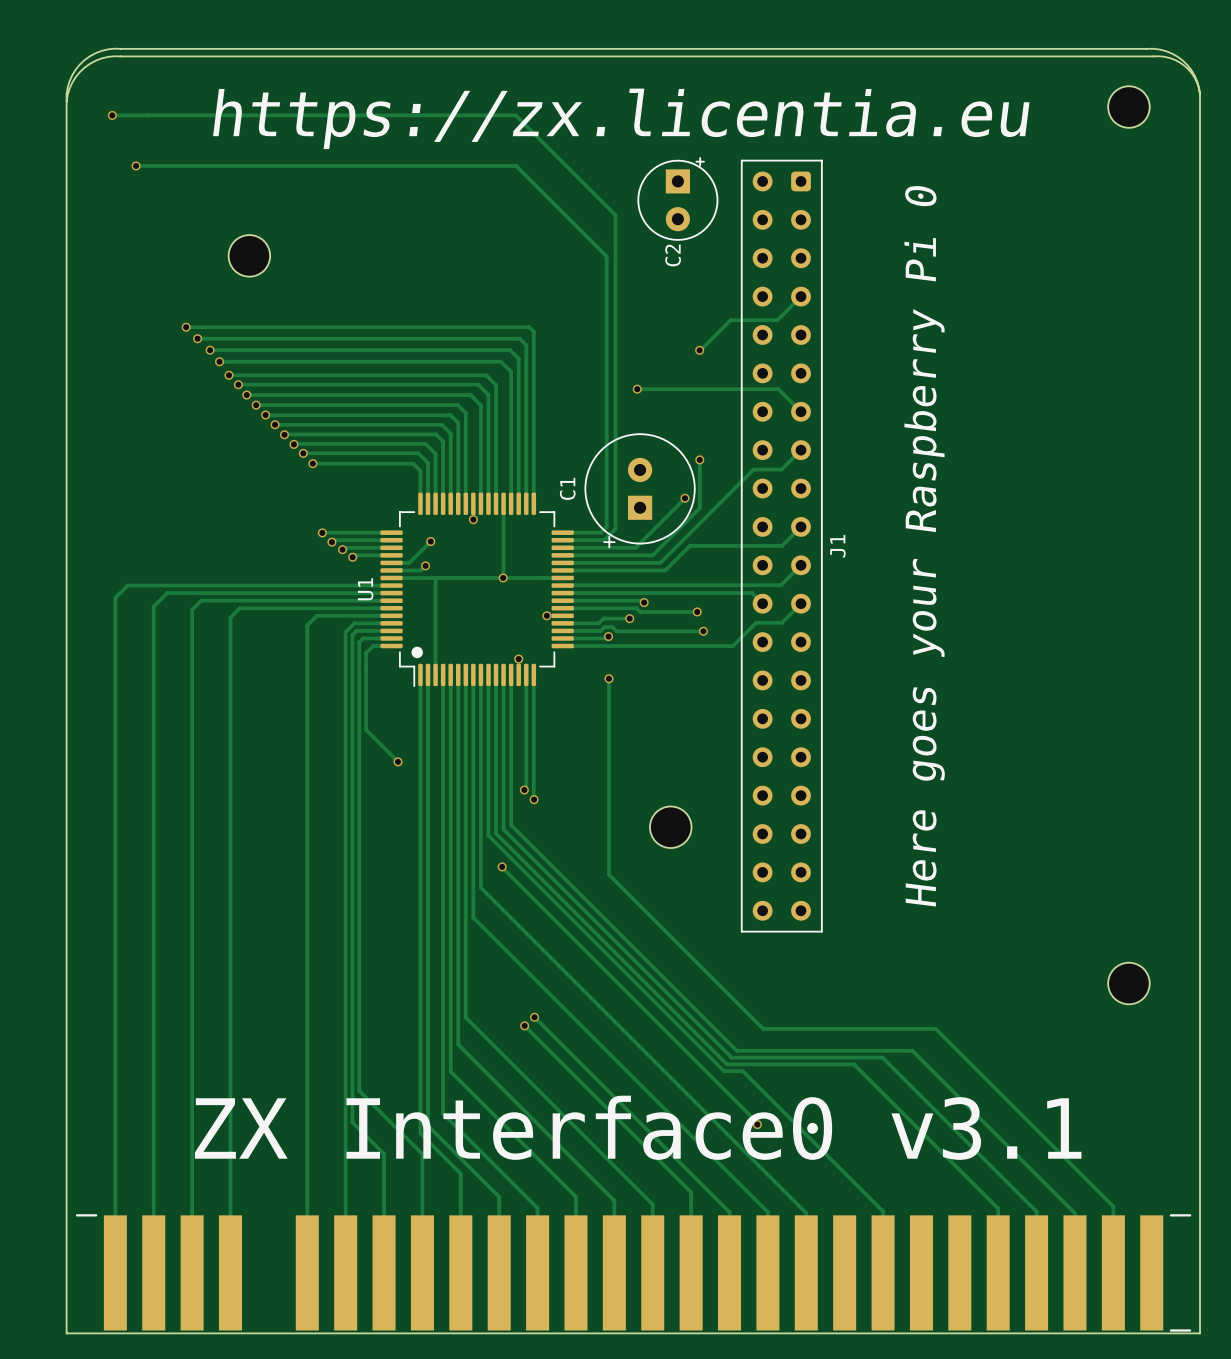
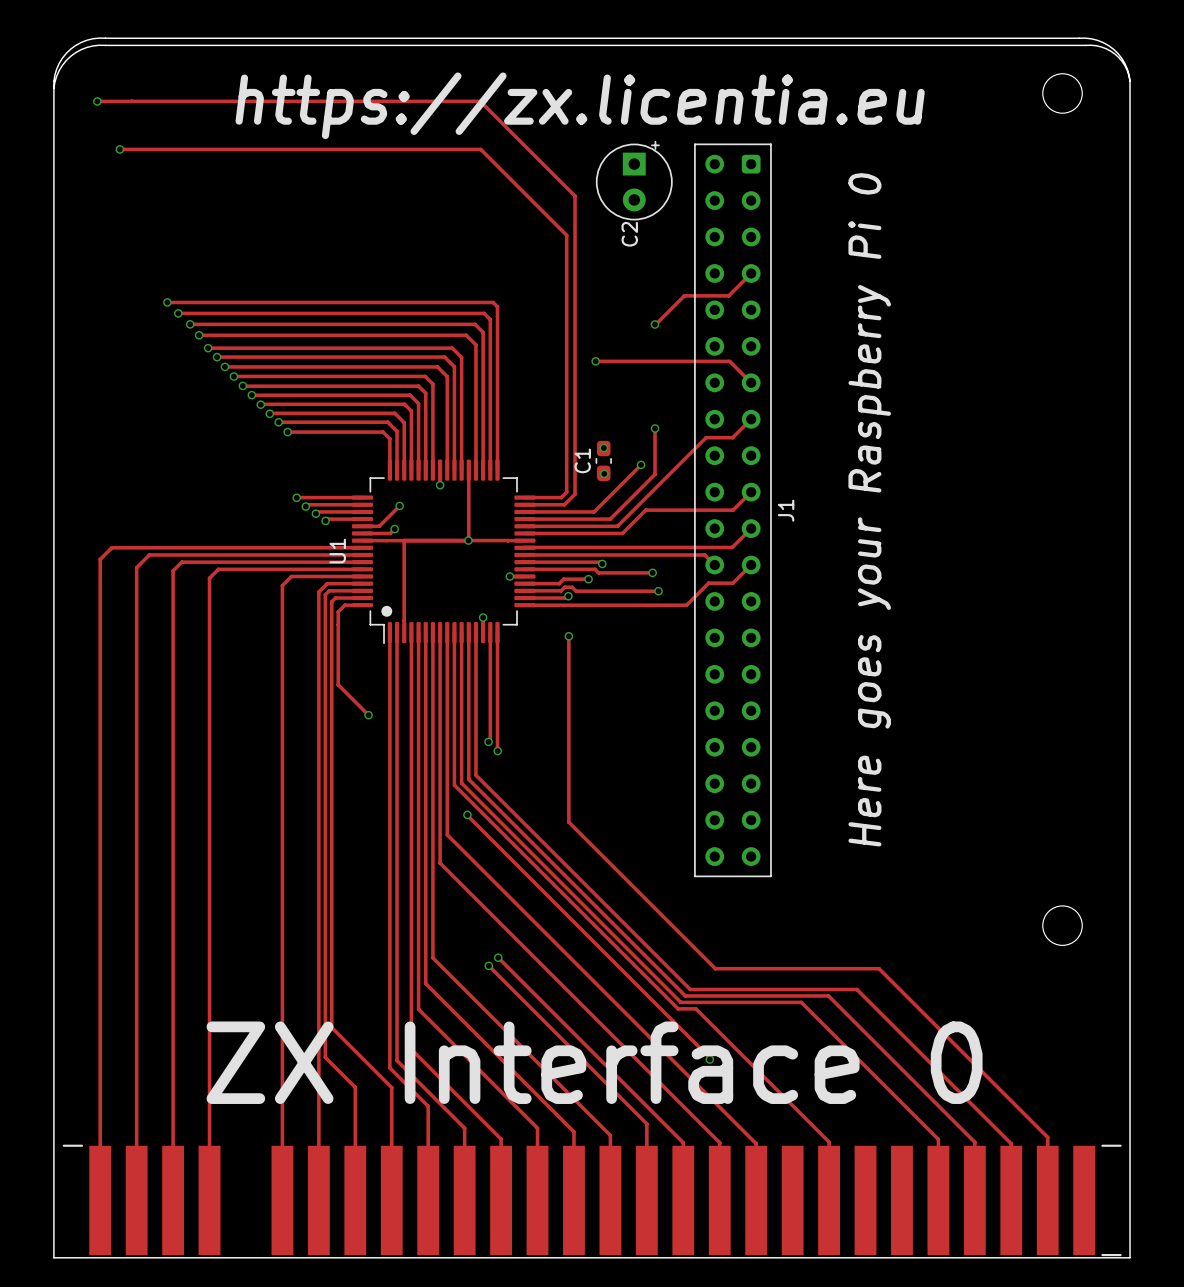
part: (249, 255) -> none
C1 footprint: [584, 433, 696, 549] -> [595, 440, 612, 482]
via: none -> (603, 448)
C1 name position: C1 (567, 488) -> C1 (582, 460)
via: none -> (604, 473)
part: (670, 827) -> none
text: ZX Interface0 v3.1 (638, 1127) -> ZX Interface 0 (594, 1062)

